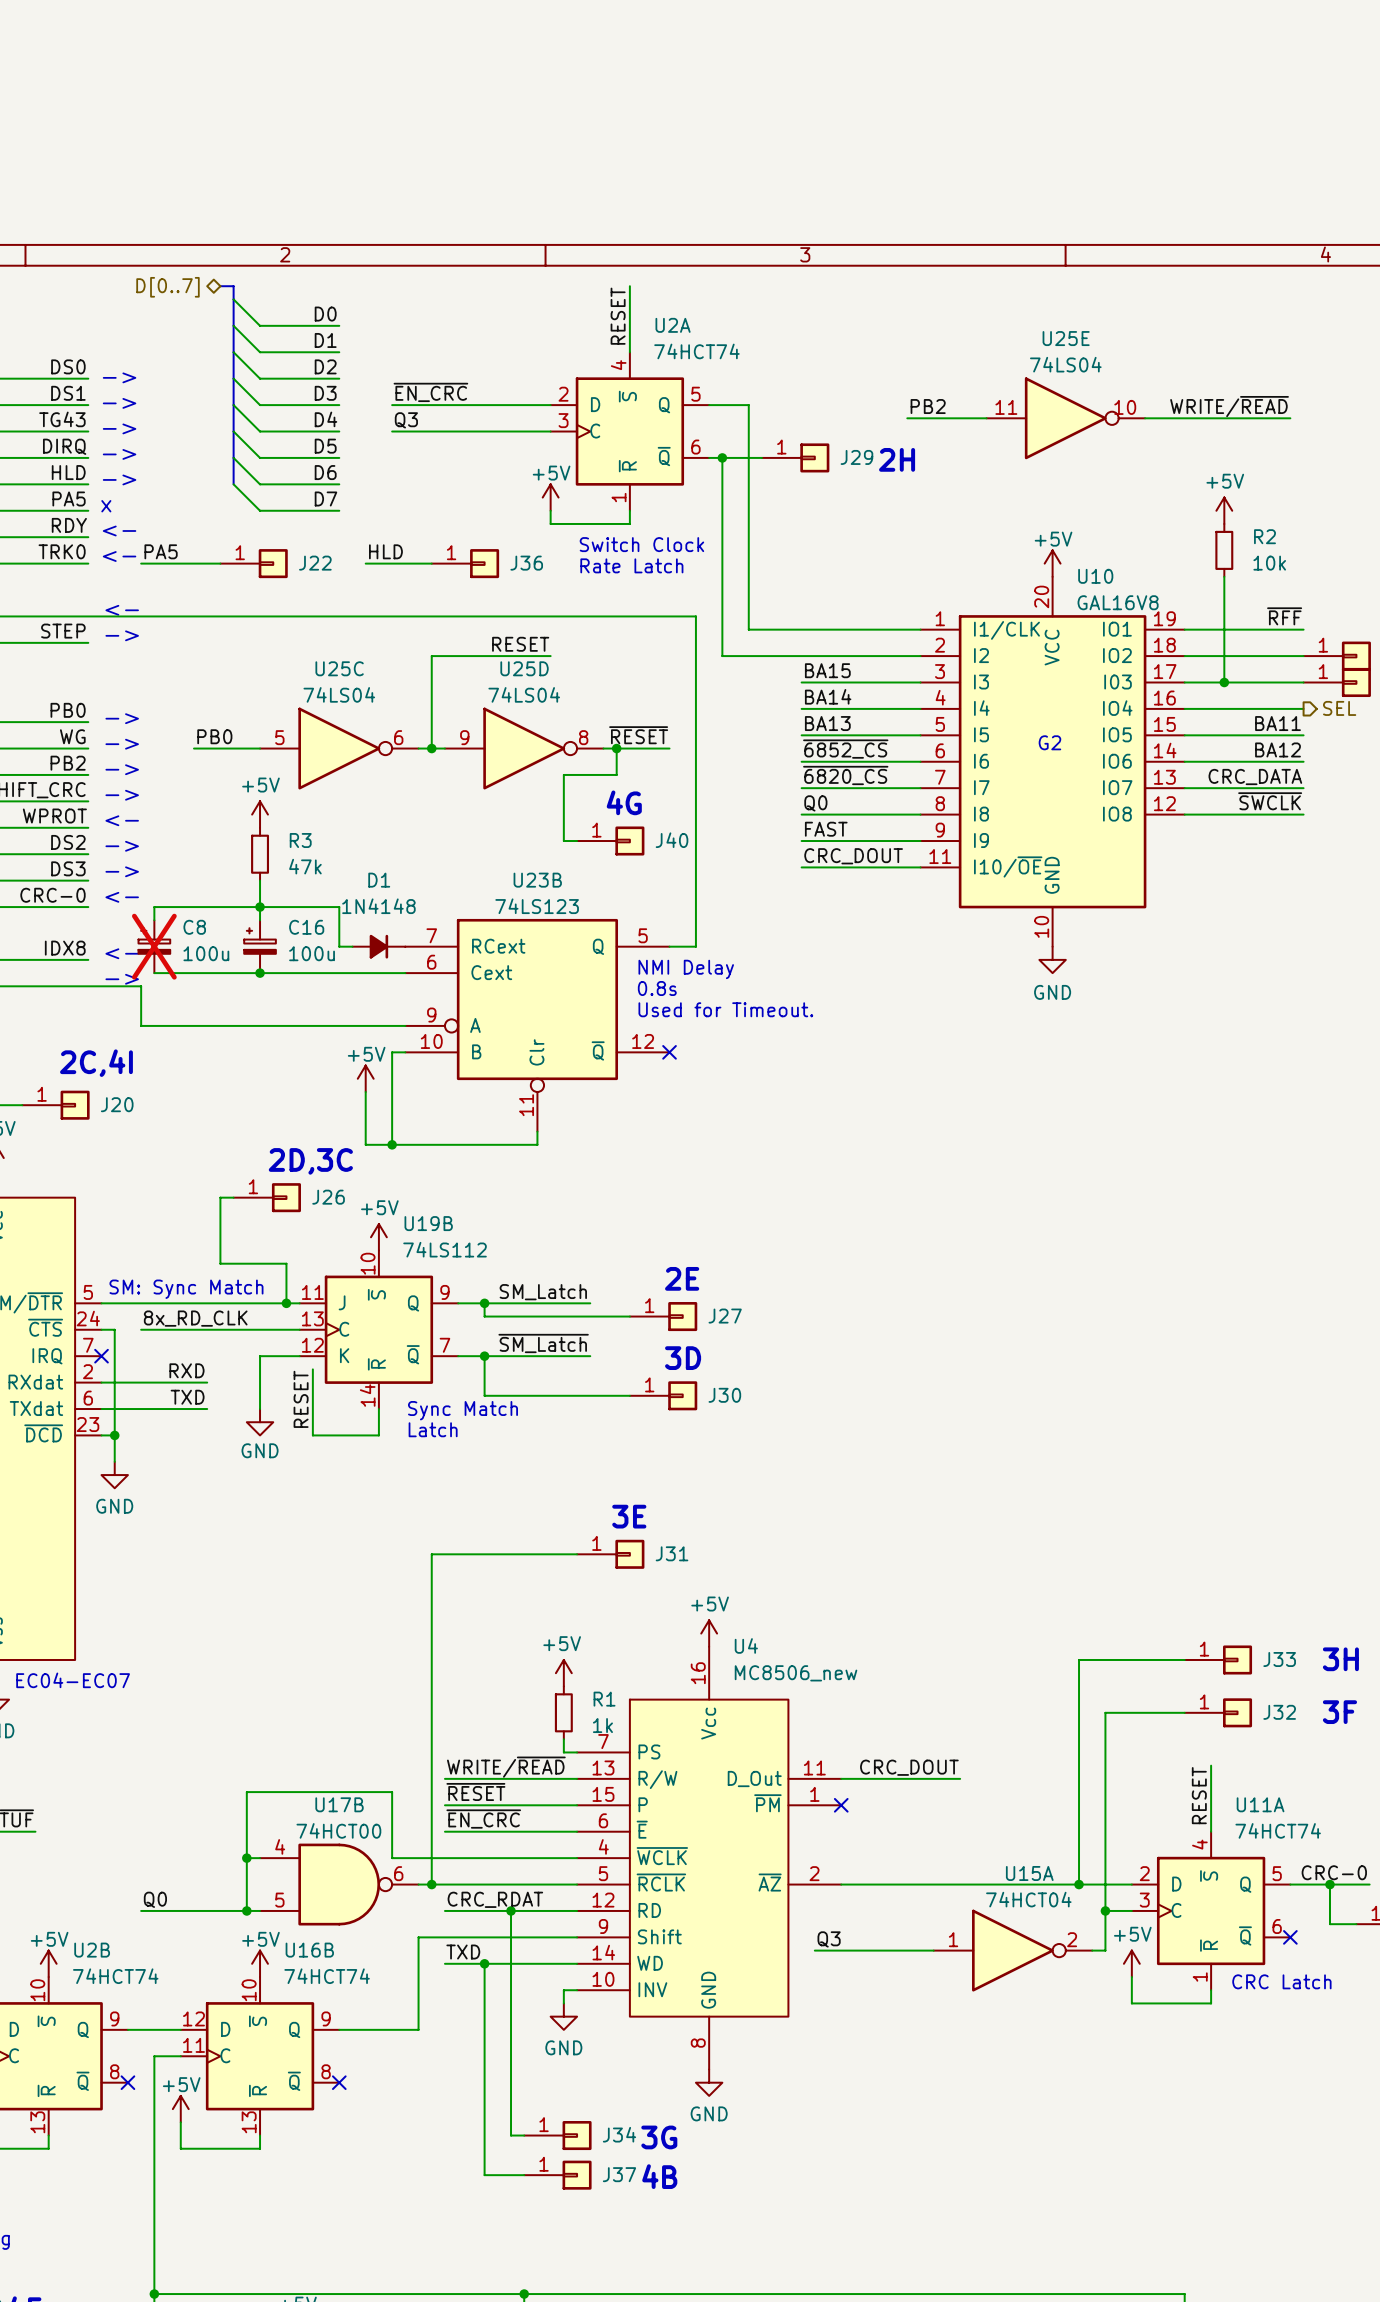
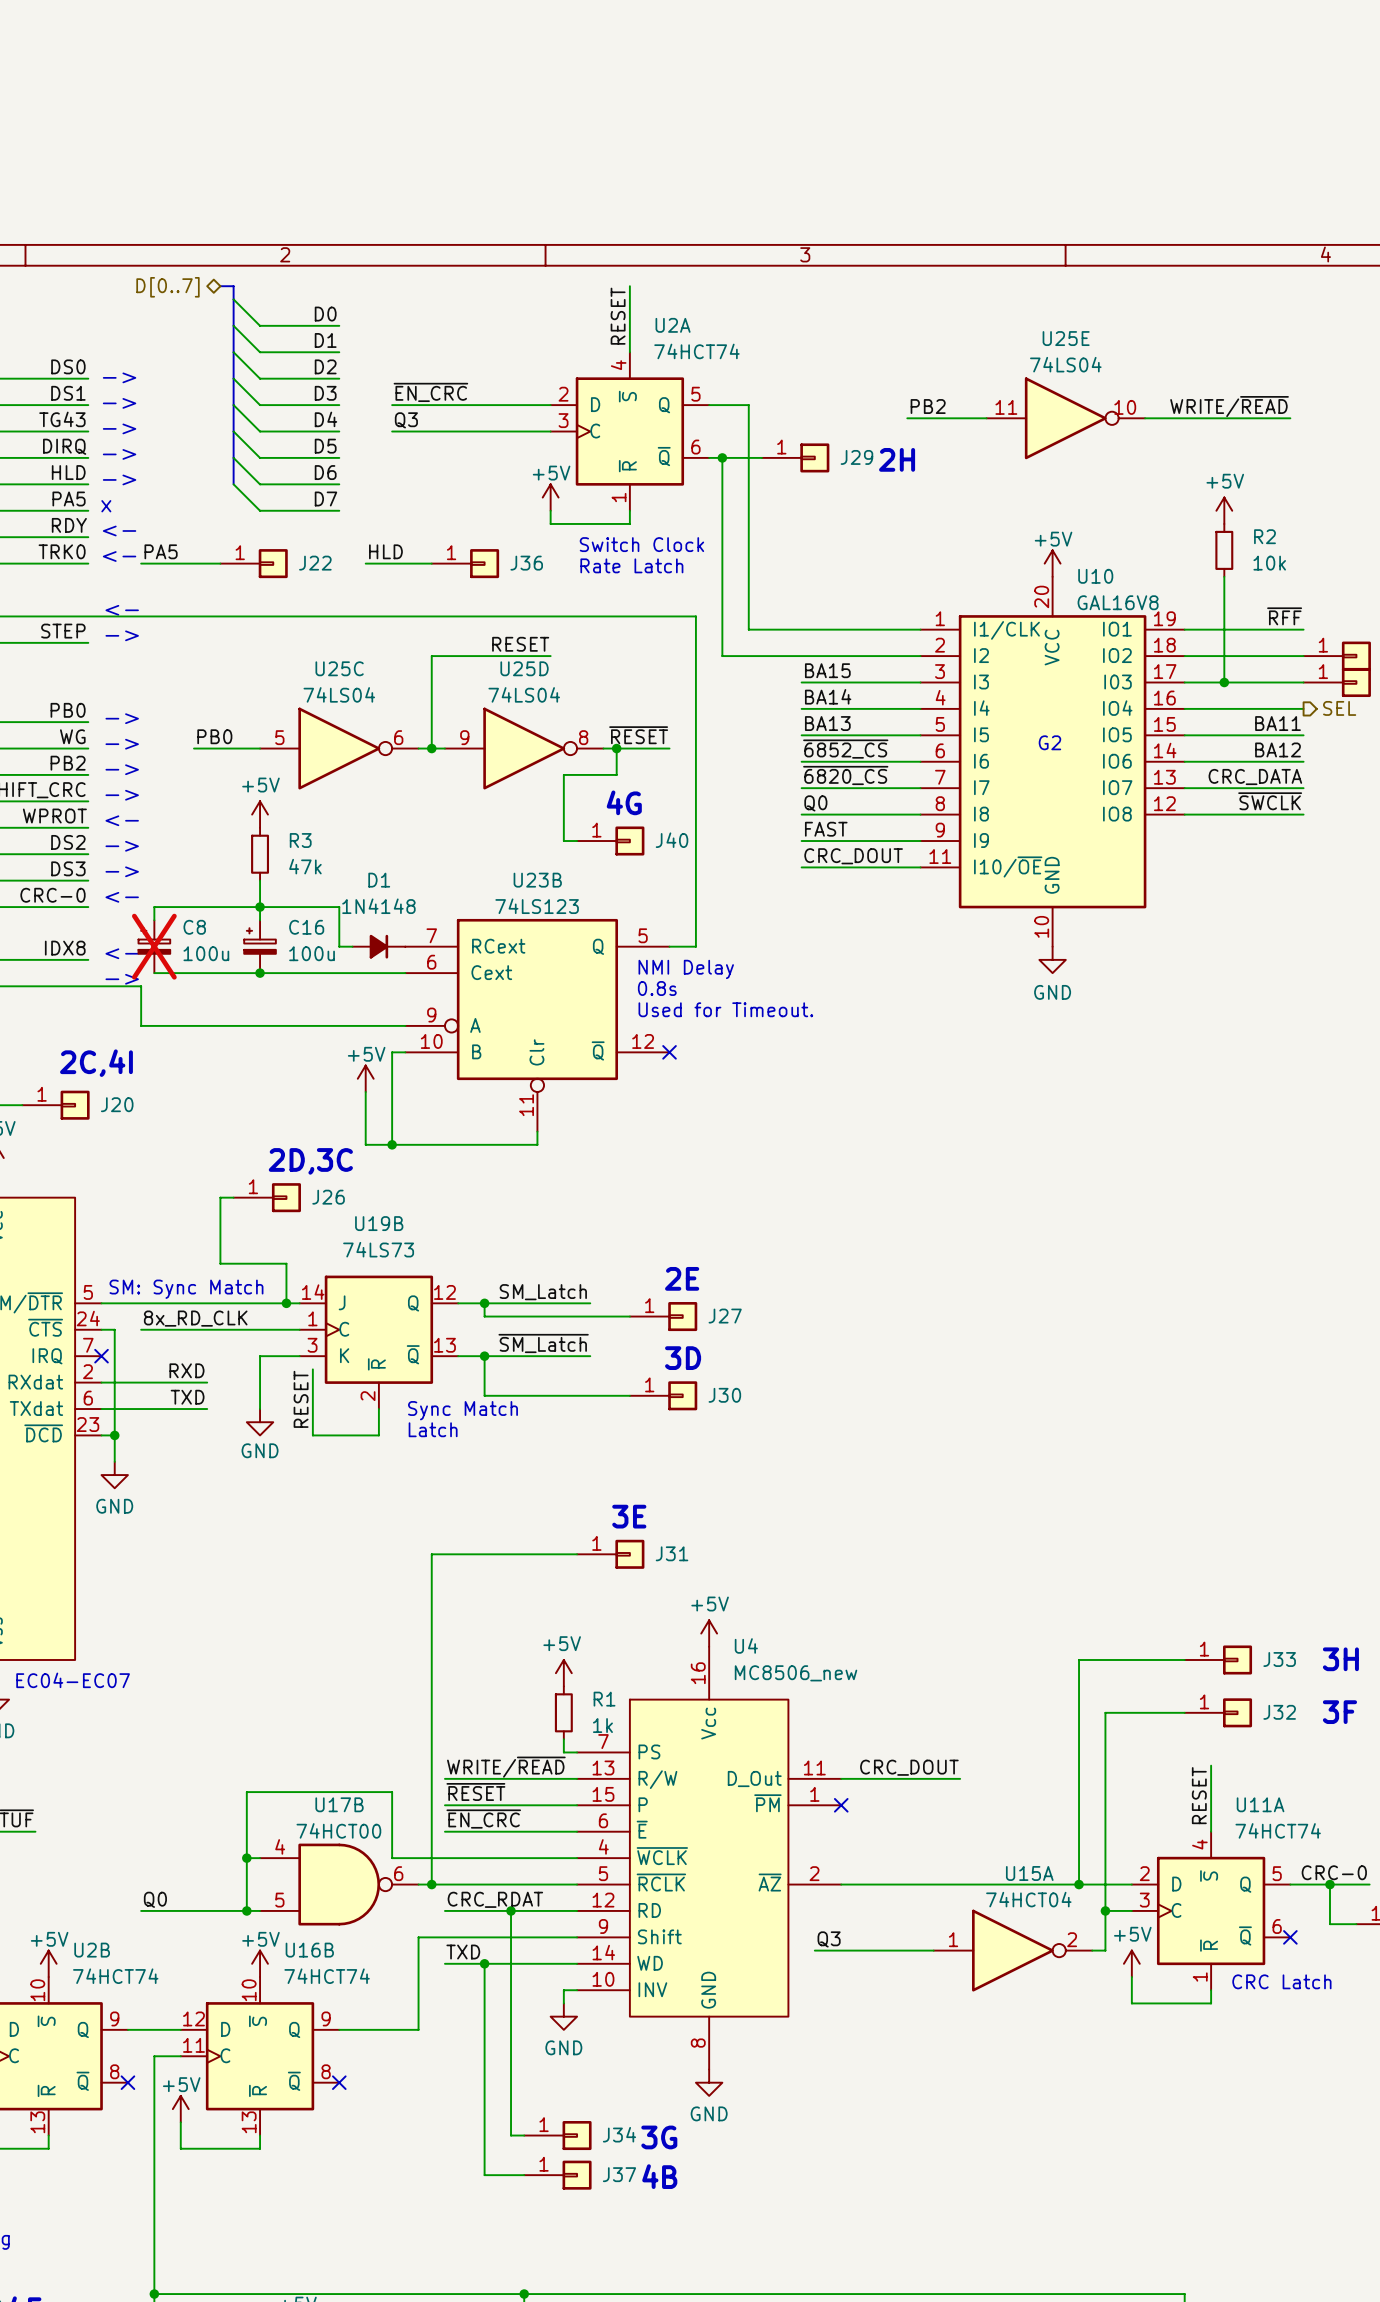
U19B name position: U19B (428, 1223) -> U19B (379, 1223)
power symbol: +5V (378, 1237) -> none
U19B value: 74LS112 (445, 1249) -> 74LS73 (378, 1249)
U19B symbol: [299, 1250, 459, 1410] -> [299, 1275, 459, 1410]

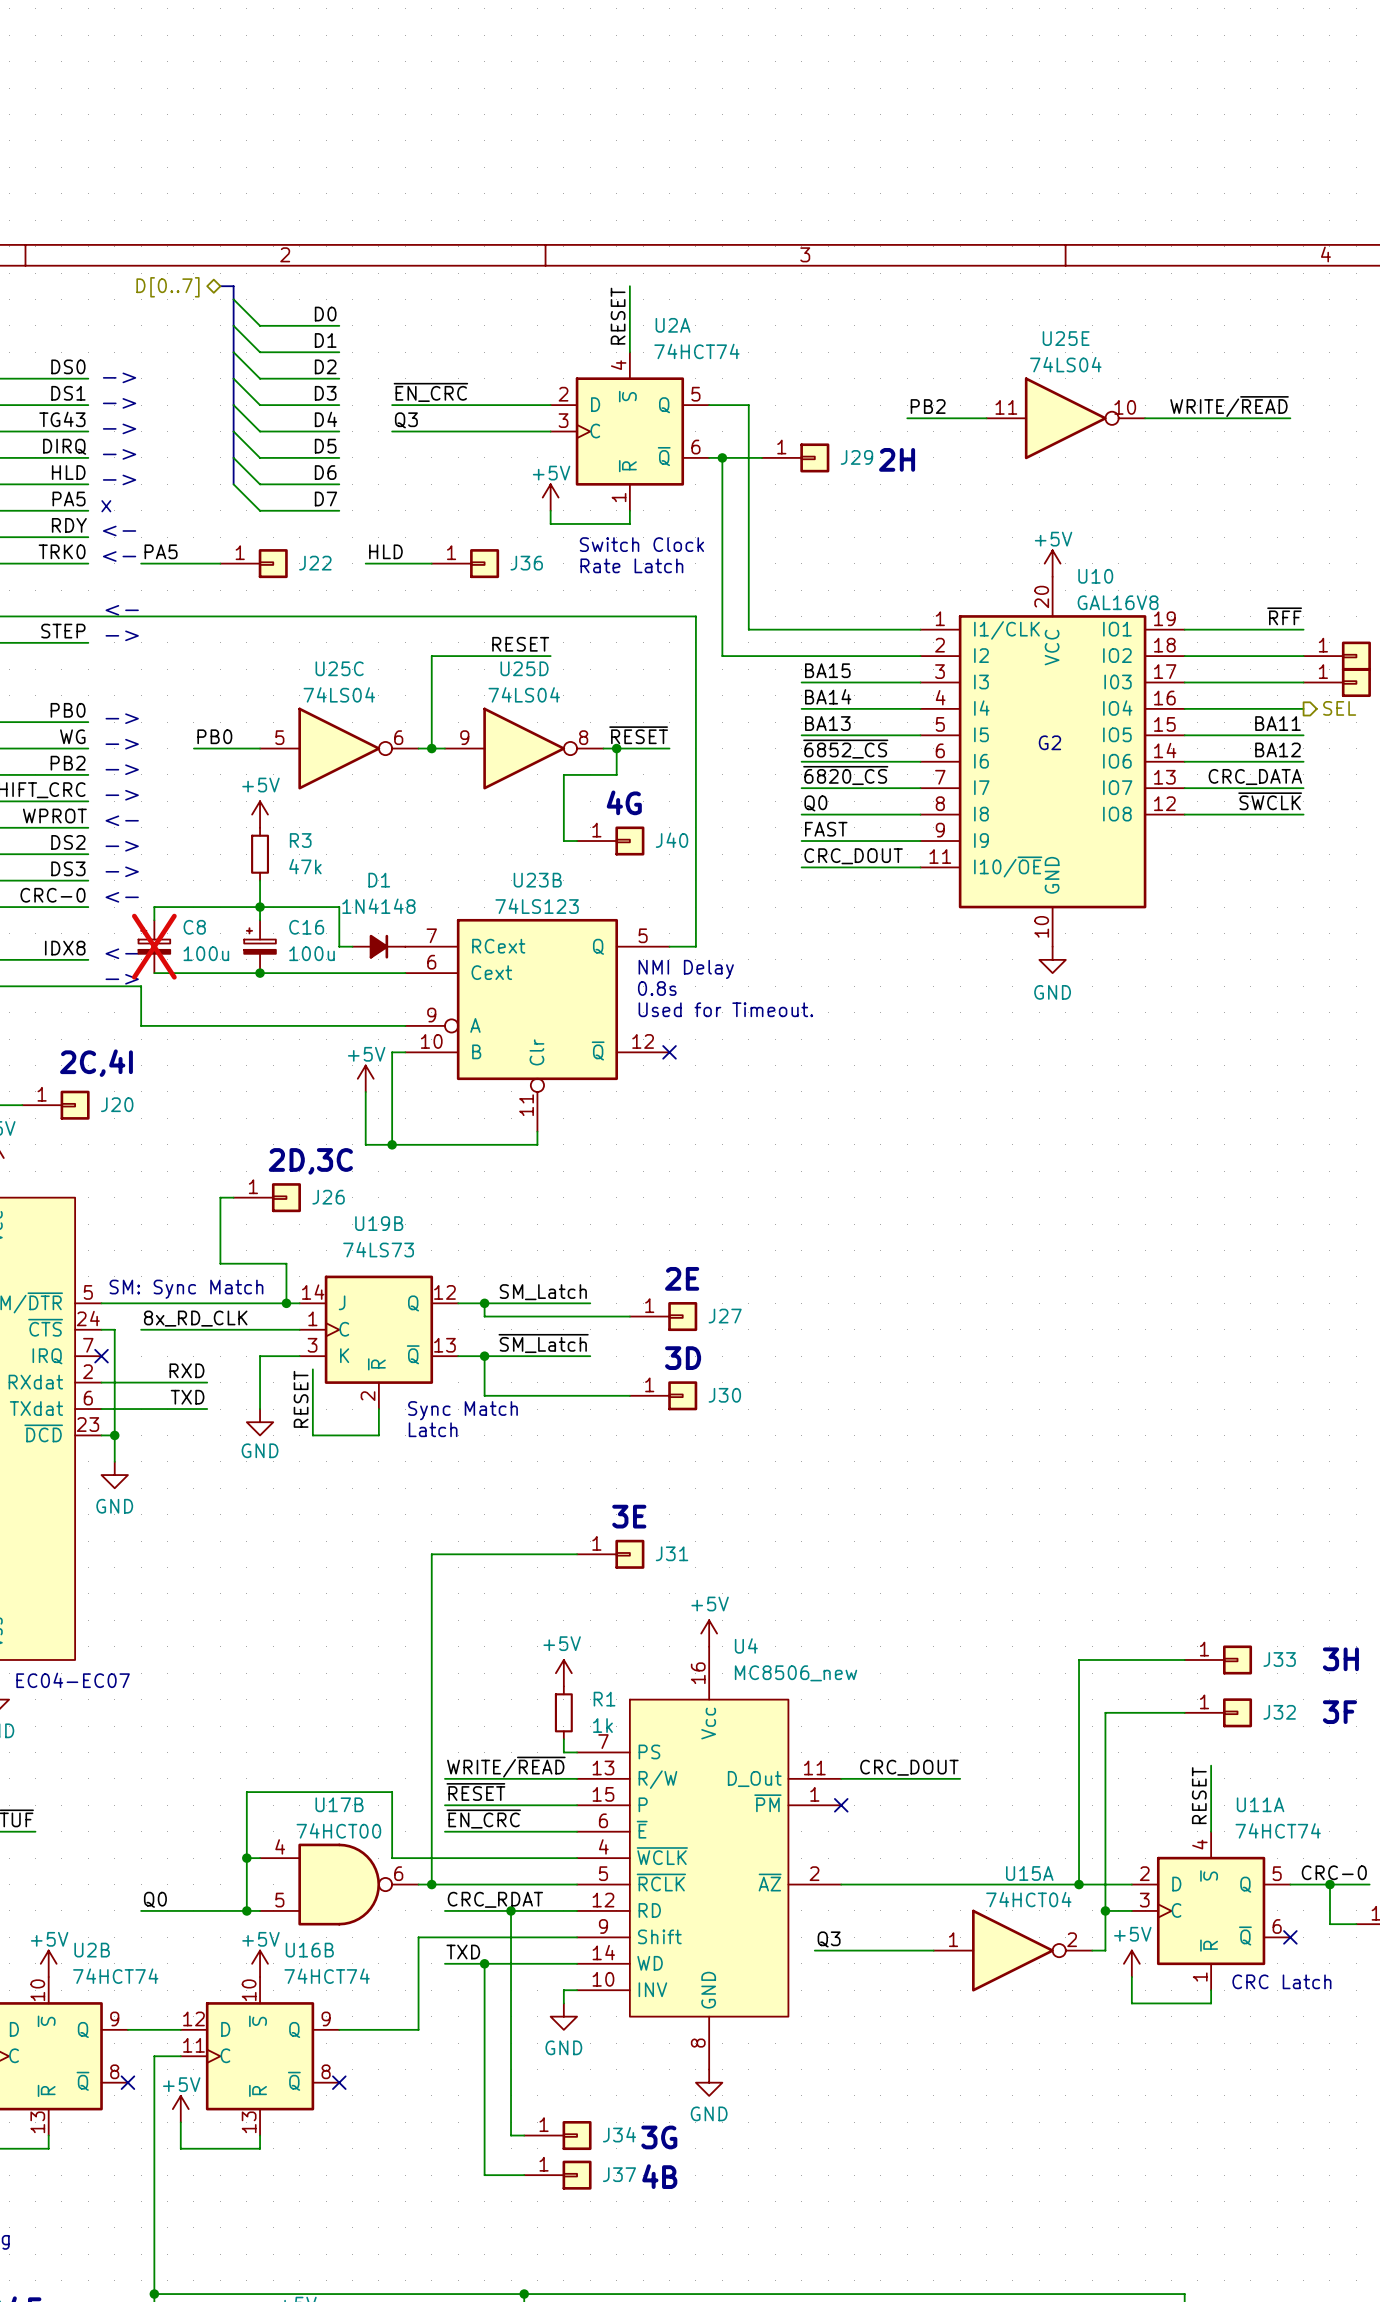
power symbol: +5V (1224, 510) -> none
R2: 10k (1224, 550) -> none
wire: (1224, 576) (1224, 682) -> none
junction: (1224, 682) -> none

